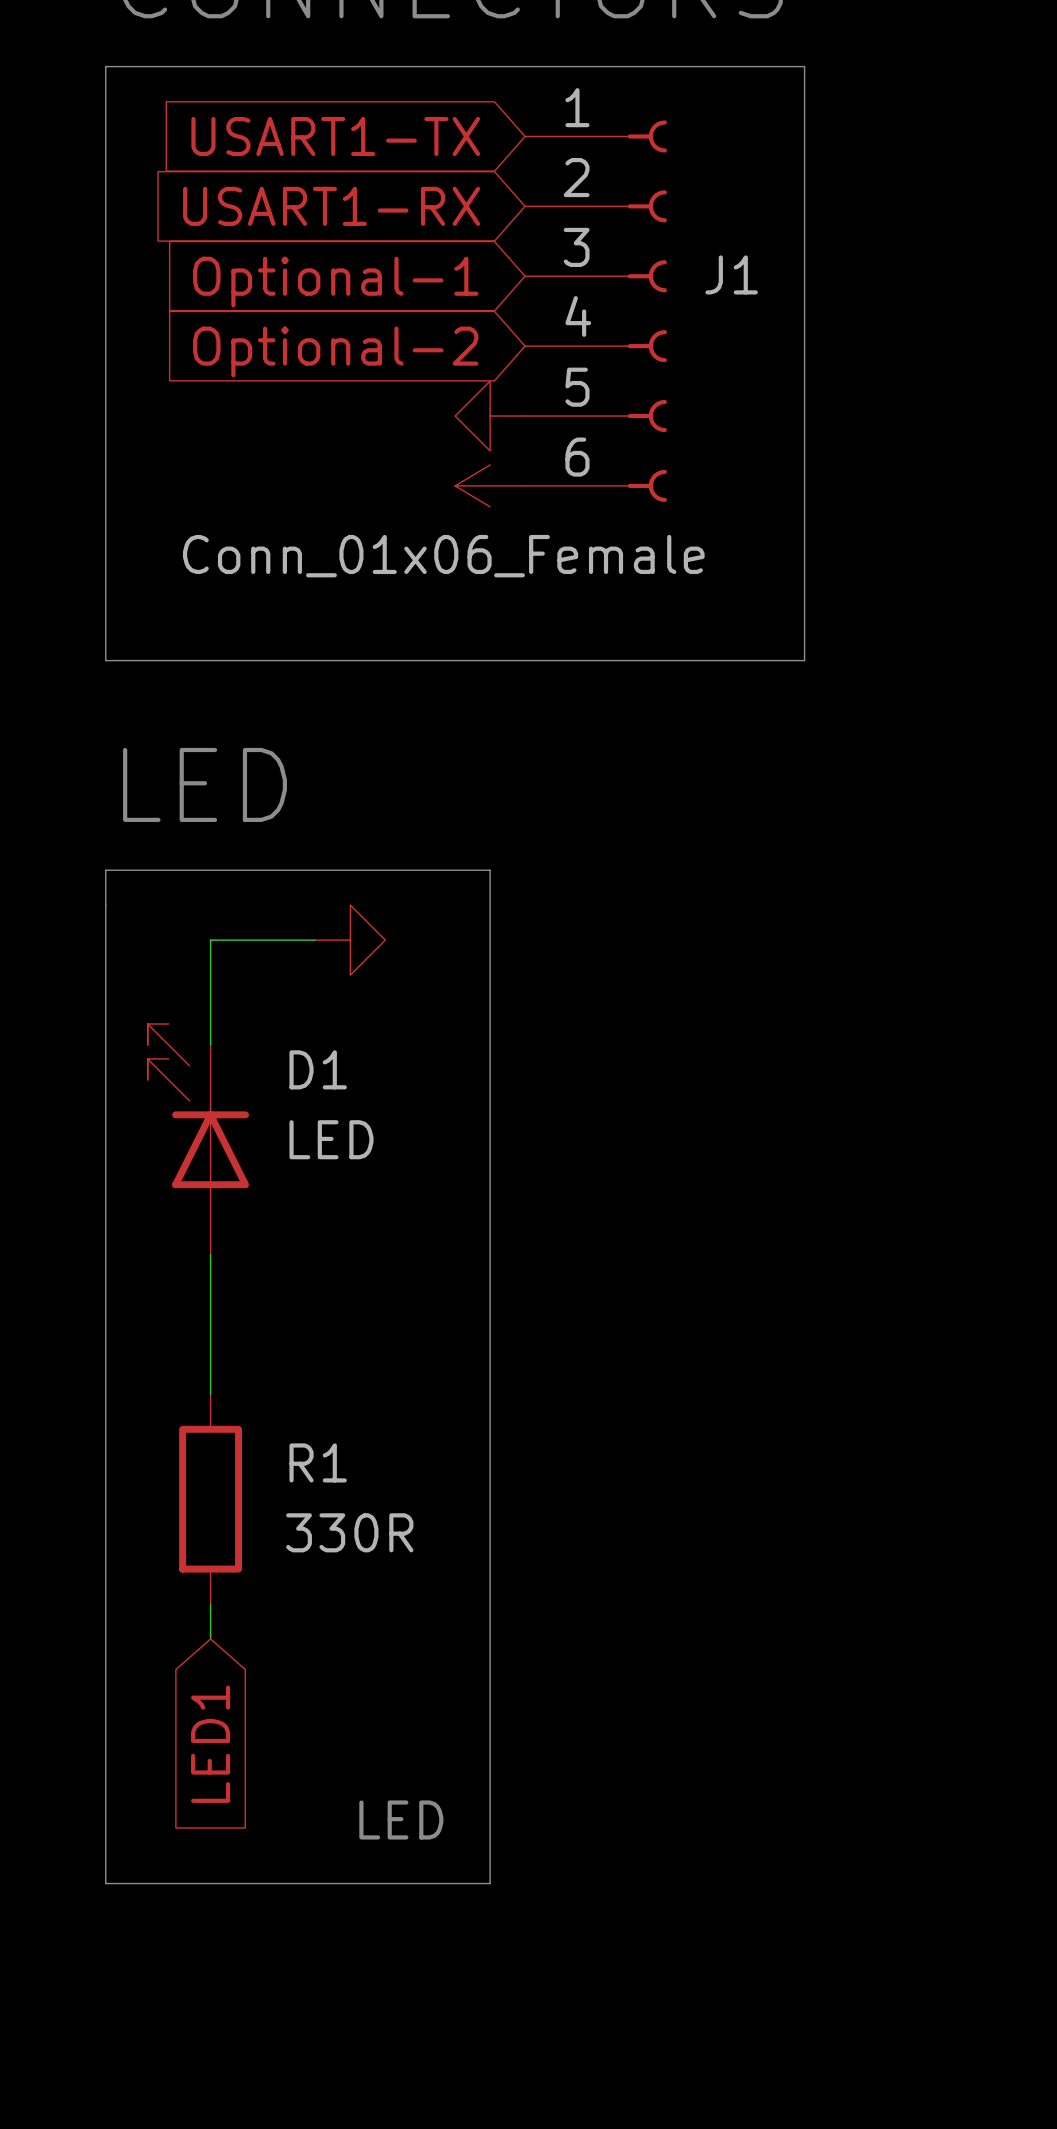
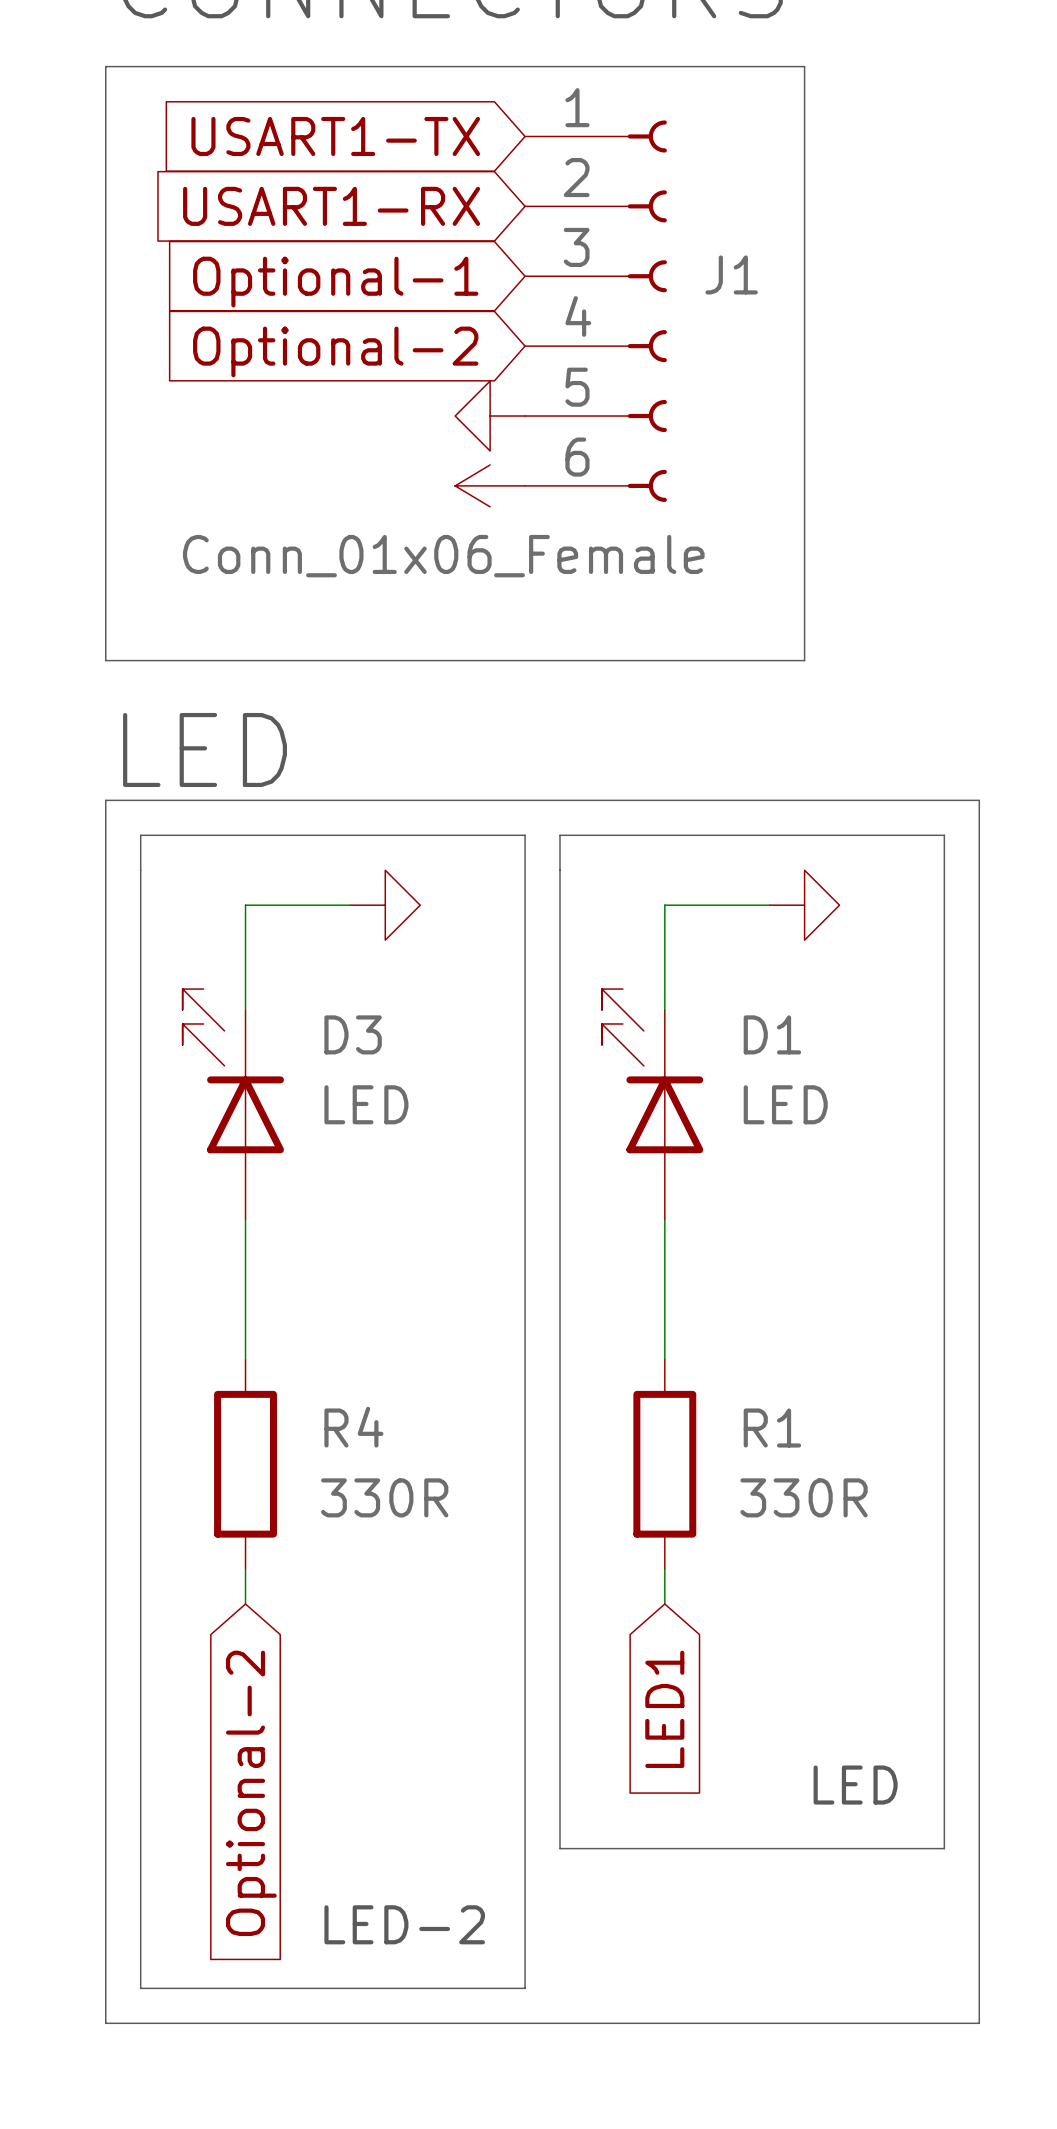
text position: LED (205, 784) -> LED (205, 749)
line: none -> (140, 835) (525, 835) (525, 1988) (140, 1988) (140, 835)
line: none -> (559, 835) (944, 835) (944, 1848) (559, 1848) (559, 835)
line: (105, 870) (490, 870) (490, 1883) (105, 1883) -> (105, 870) (105, 800) (979, 800) (979, 2023) (105, 2023) (105, 1883)
wire: none -> (769, 905) (664, 905) (664, 1010)
power symbol: none -> (804, 905)
wire: (315, 940) (210, 940) (210, 1044) -> (350, 905) (245, 905) (245, 1010)
power symbol position: (350, 940) -> (385, 905)
D3: none -> LED (233, 1104)
D1 position: (198, 1139) -> (652, 1104)
wire: none -> (664, 1219) (664, 1359)
wire: (210, 1254) (210, 1394) -> (245, 1219) (245, 1359)
R4: none -> 330R (245, 1464)
R1 position: (210, 1499) -> (664, 1464)
wire: none -> (664, 1569) (664, 1604)
wire: (210, 1604) (210, 1638) -> (245, 1569) (245, 1604)
global label position: LED1 (210, 1744) -> LED1 (664, 1709)
global label: none -> Optional-2 (251, 1793)
text position: LED (401, 1819) -> LED (855, 1785)
text: none -> LED-2 (404, 1924)

